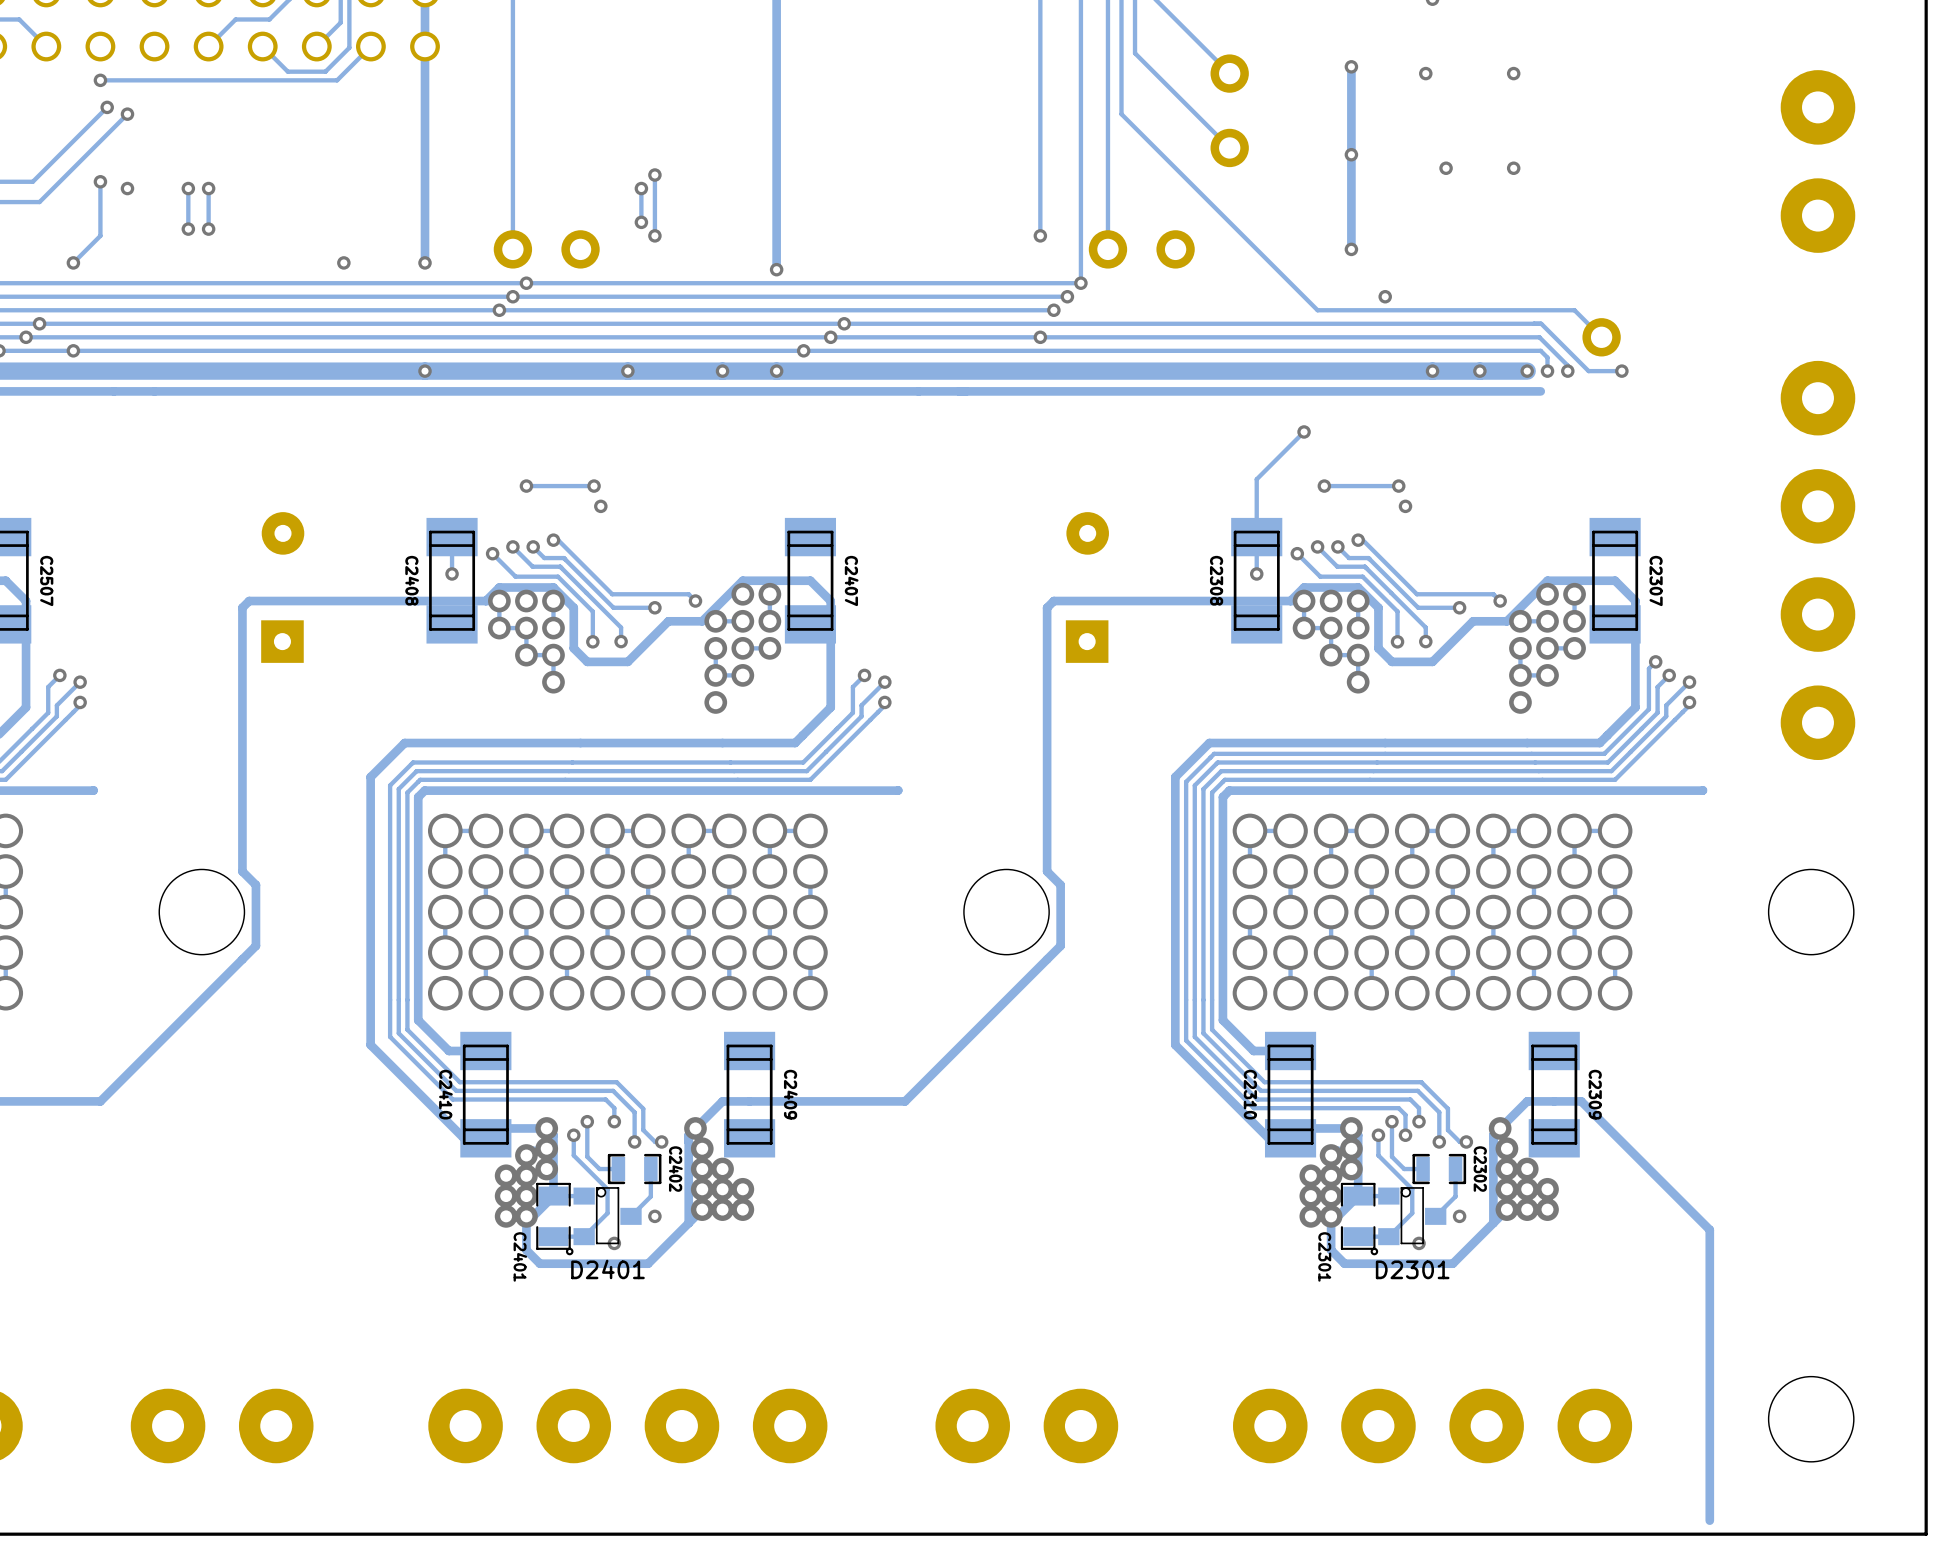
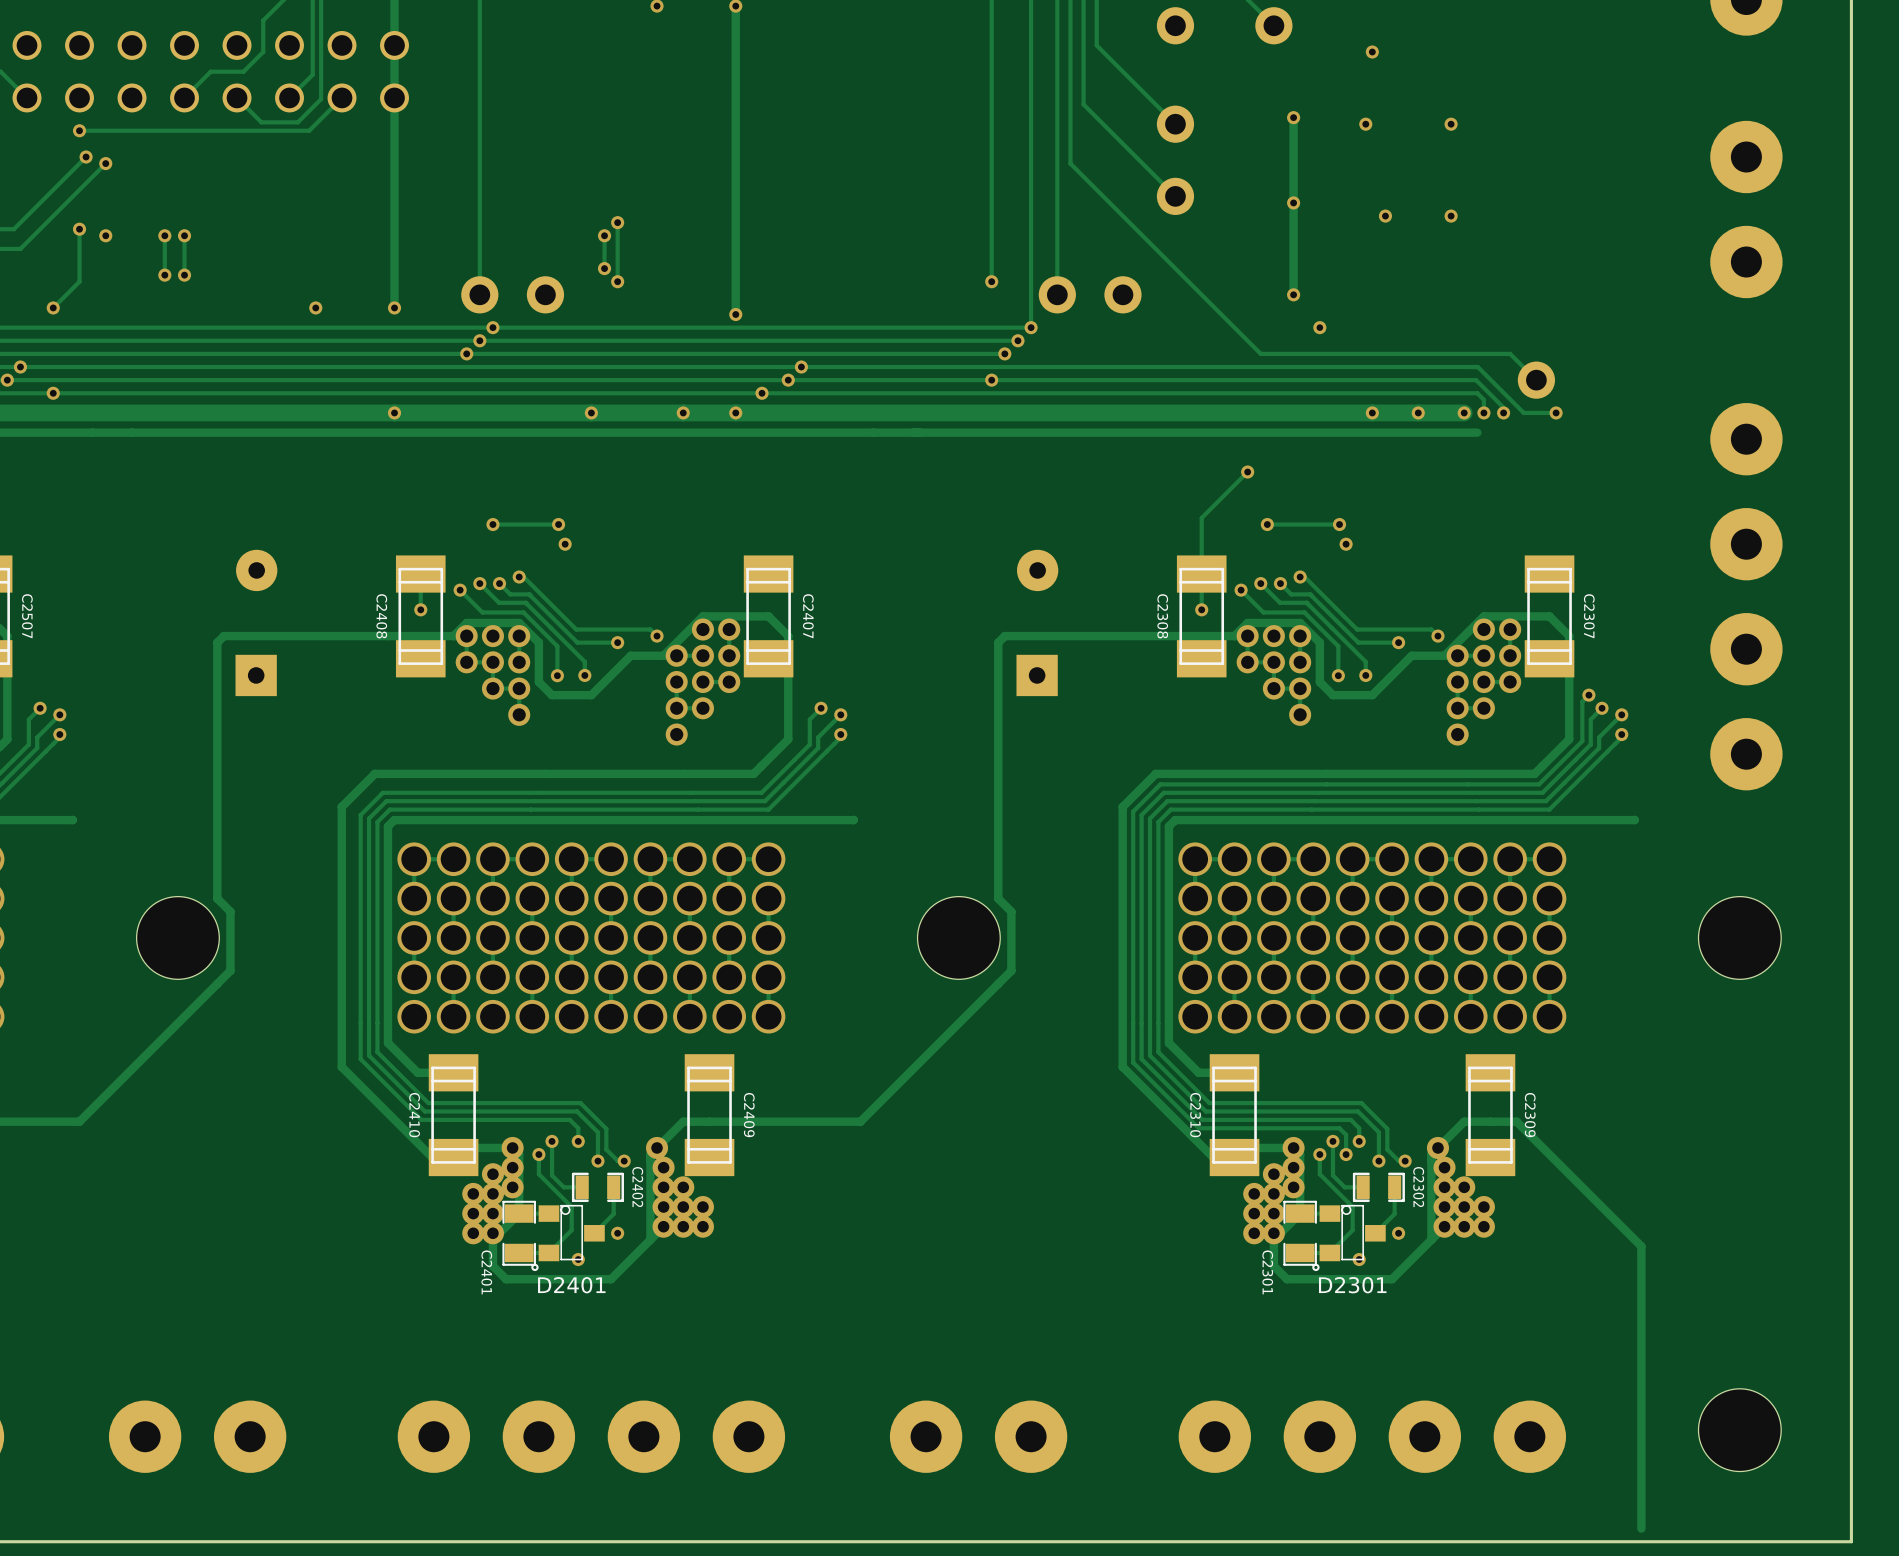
via: none -> (1319, 327)
via: (1385, 296) -> none

